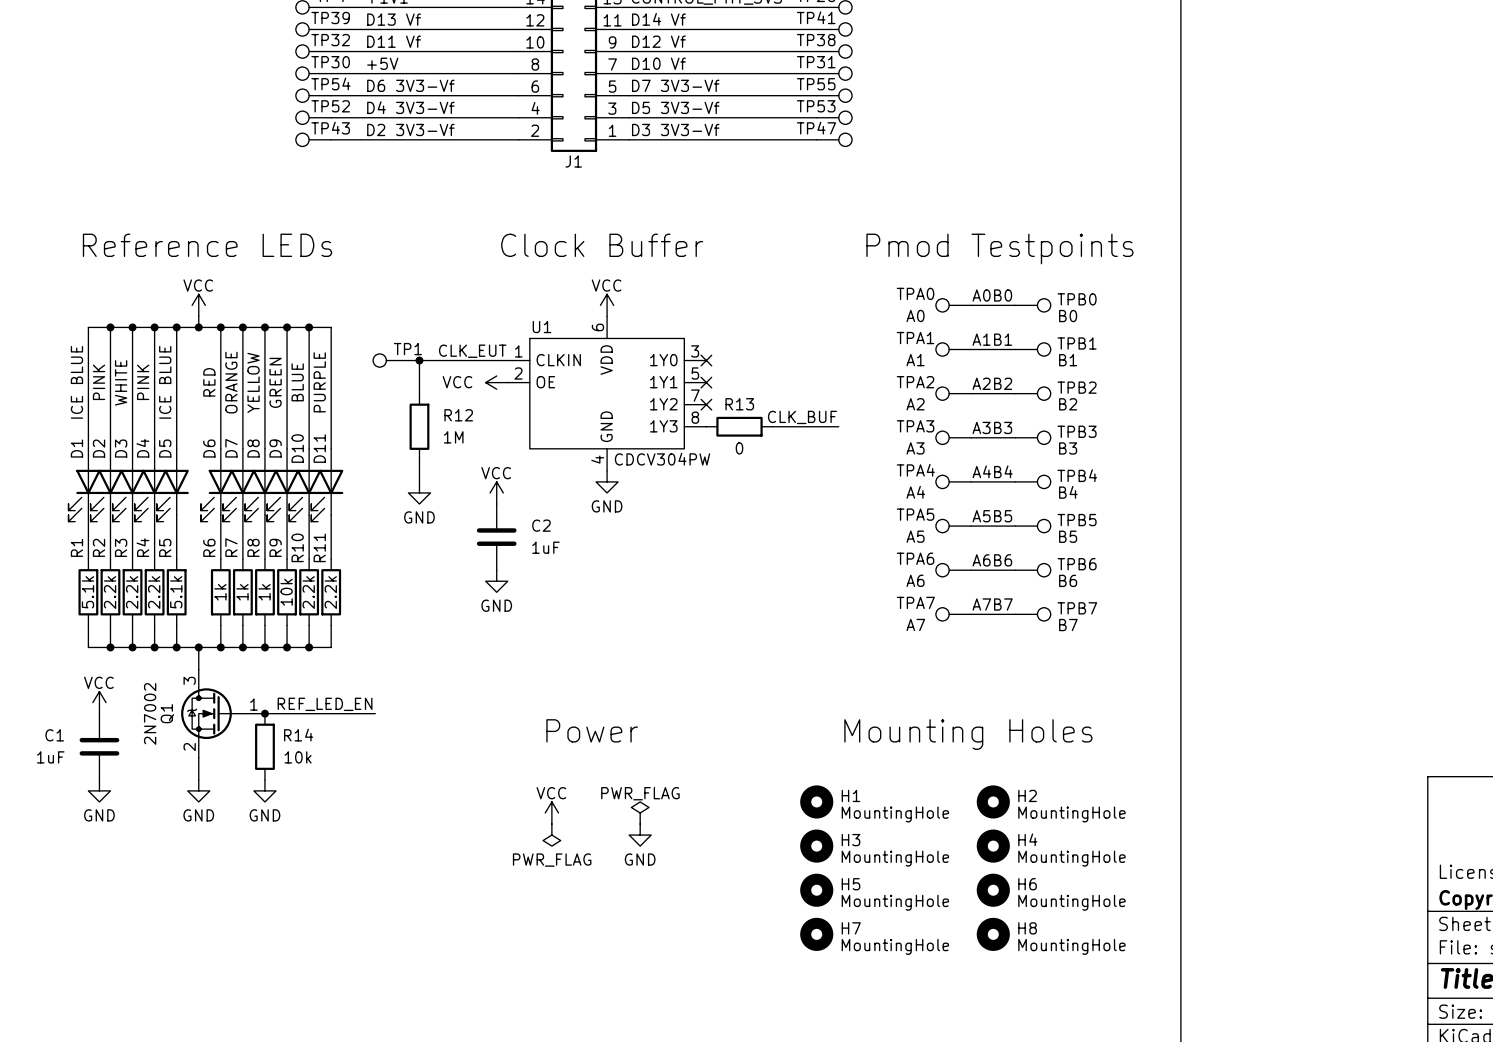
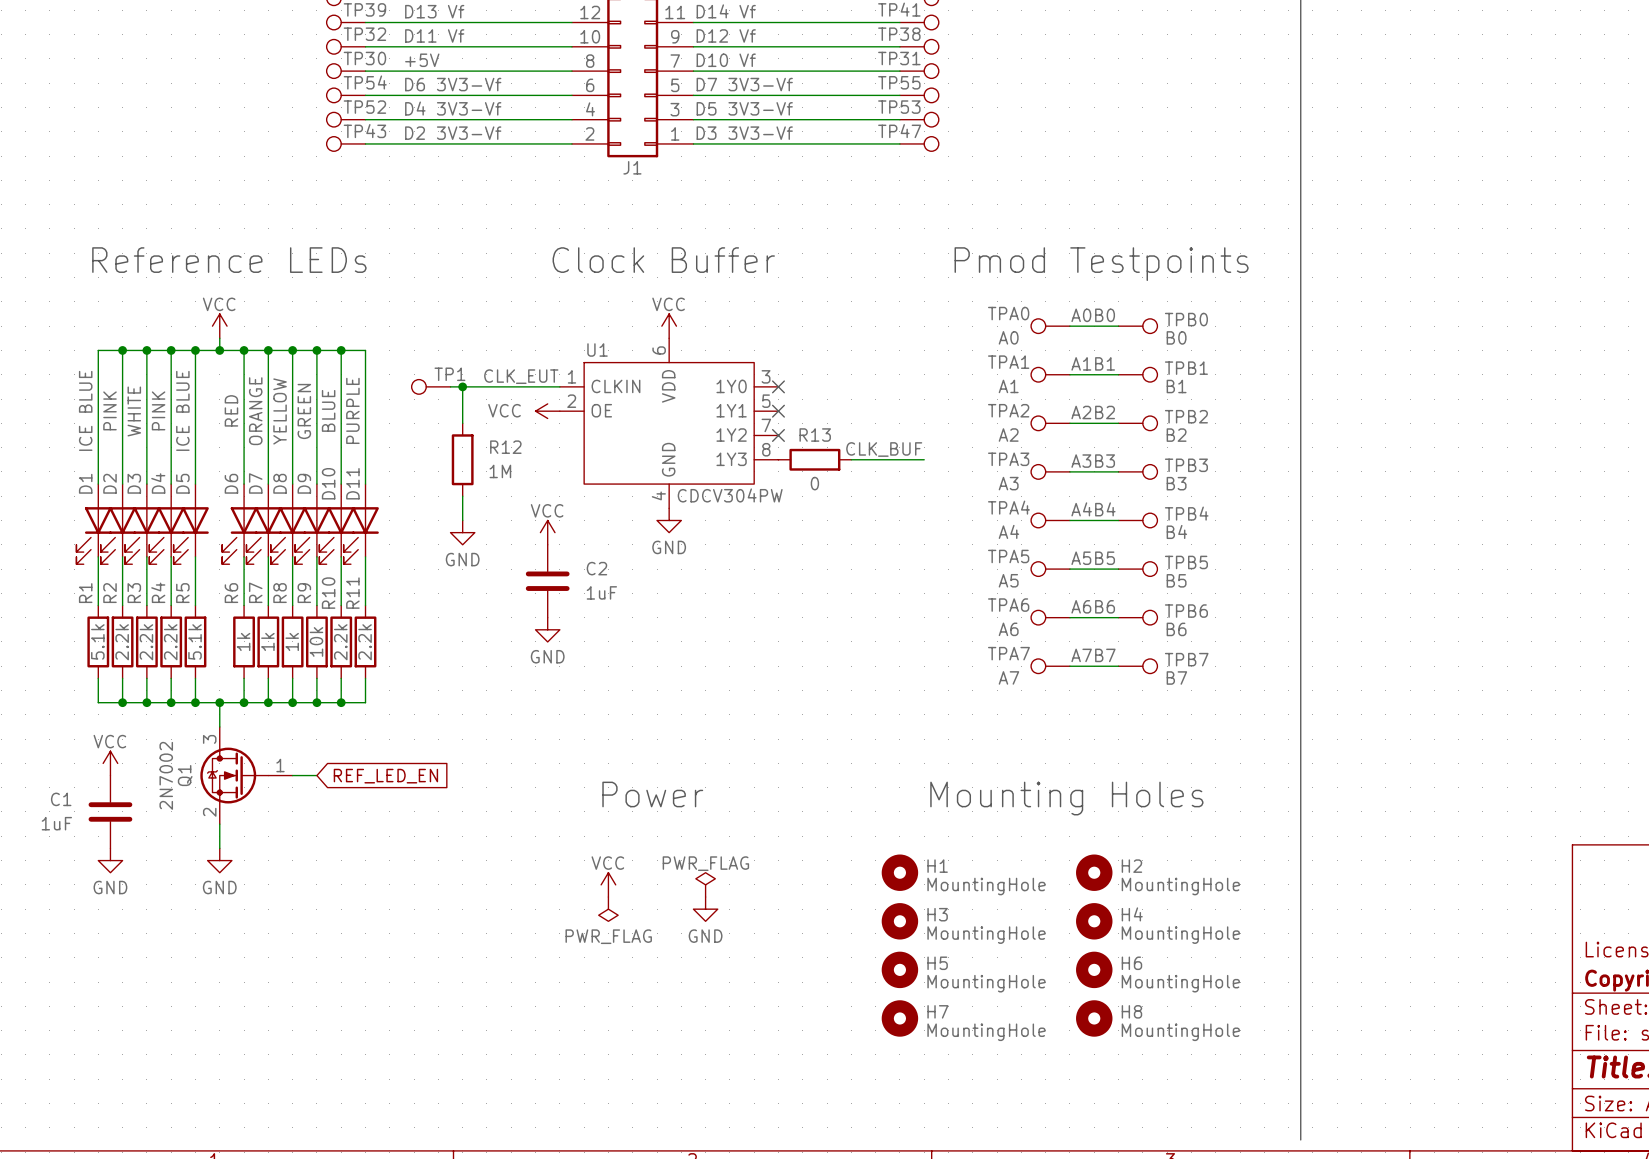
label: REF_LED_EN (325, 704) -> none
junction: (264, 713) -> none
wire: (287, 713) (375, 713) -> none
global label: none -> REF_LED_EN (385, 776)
R14: 10k (264, 746) -> none
power symbol: GND (264, 790) -> none

